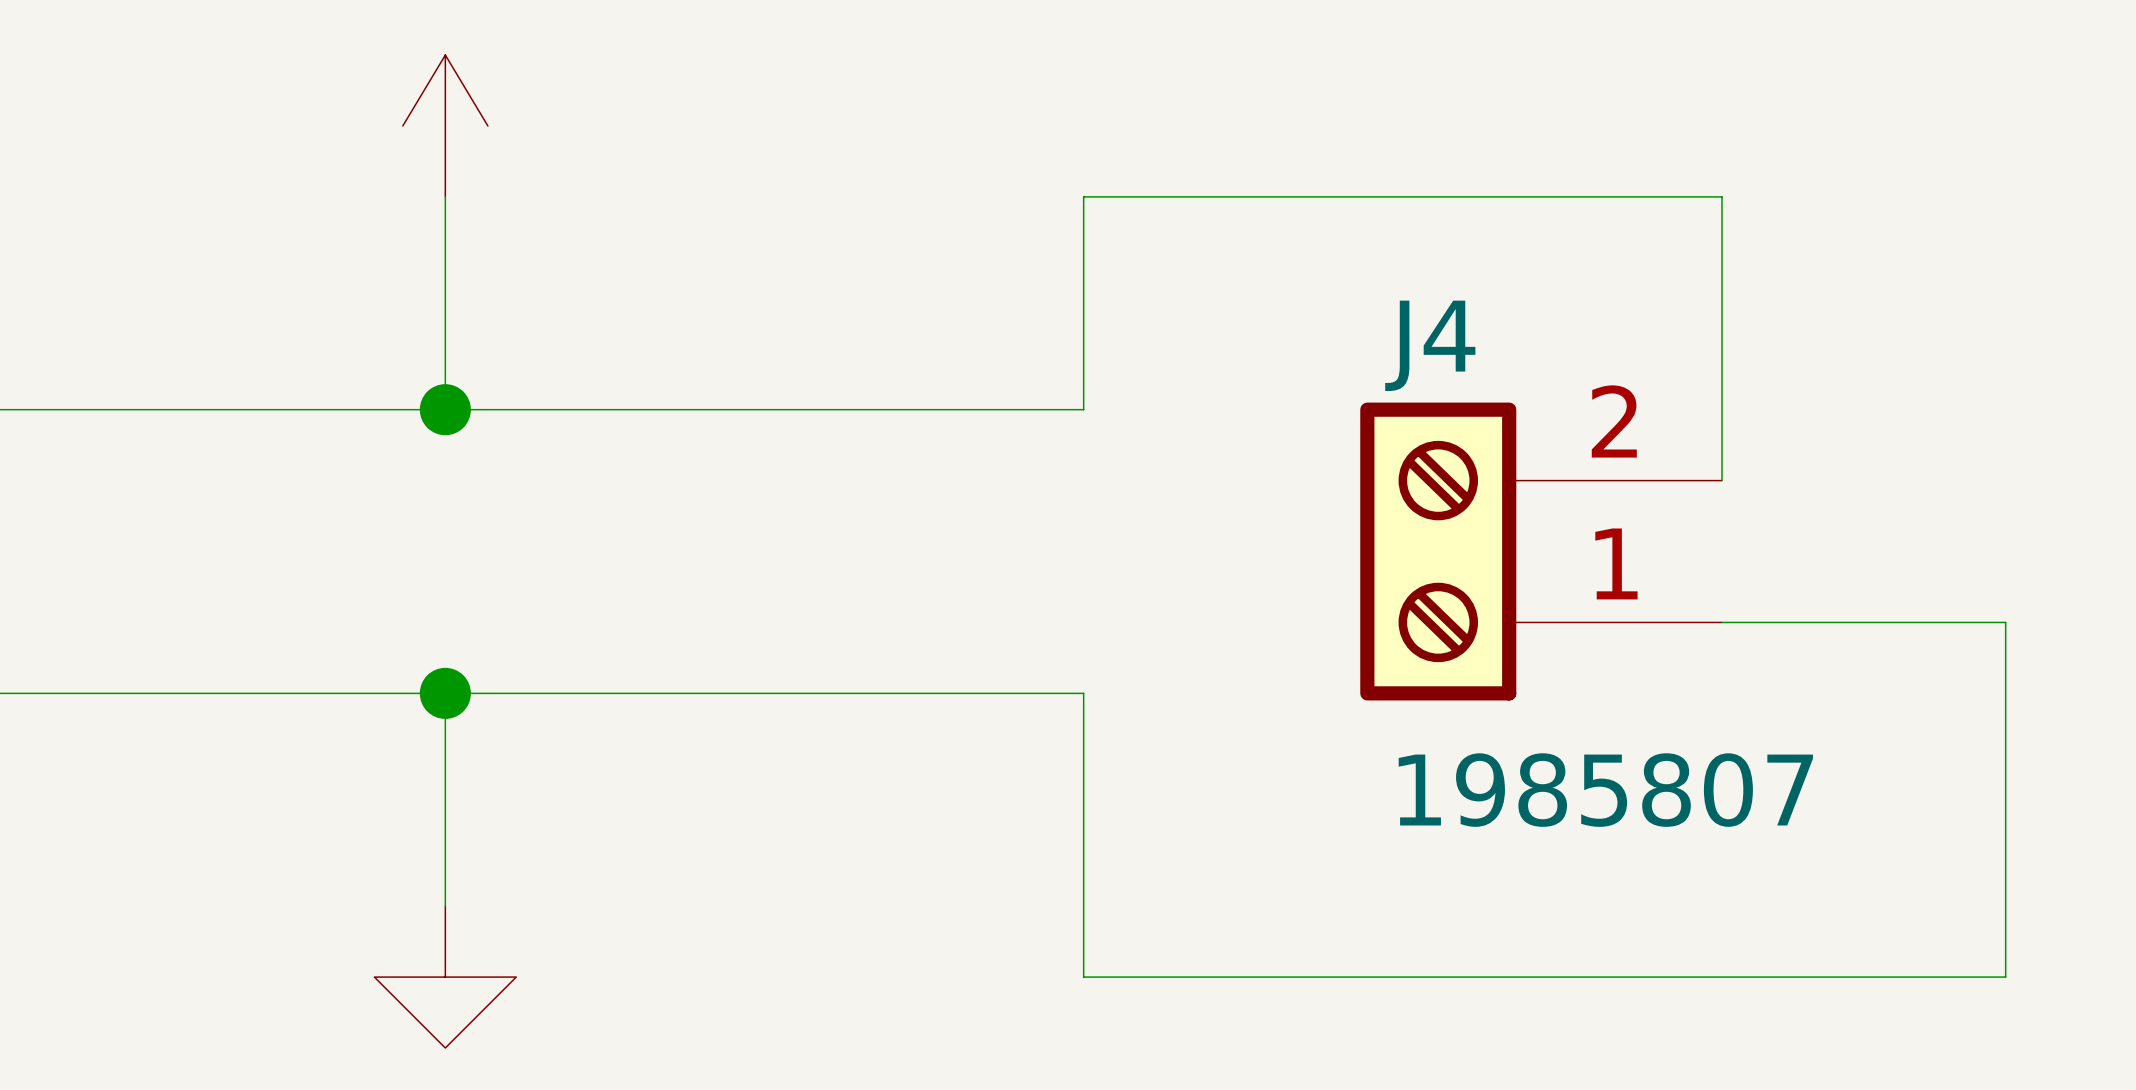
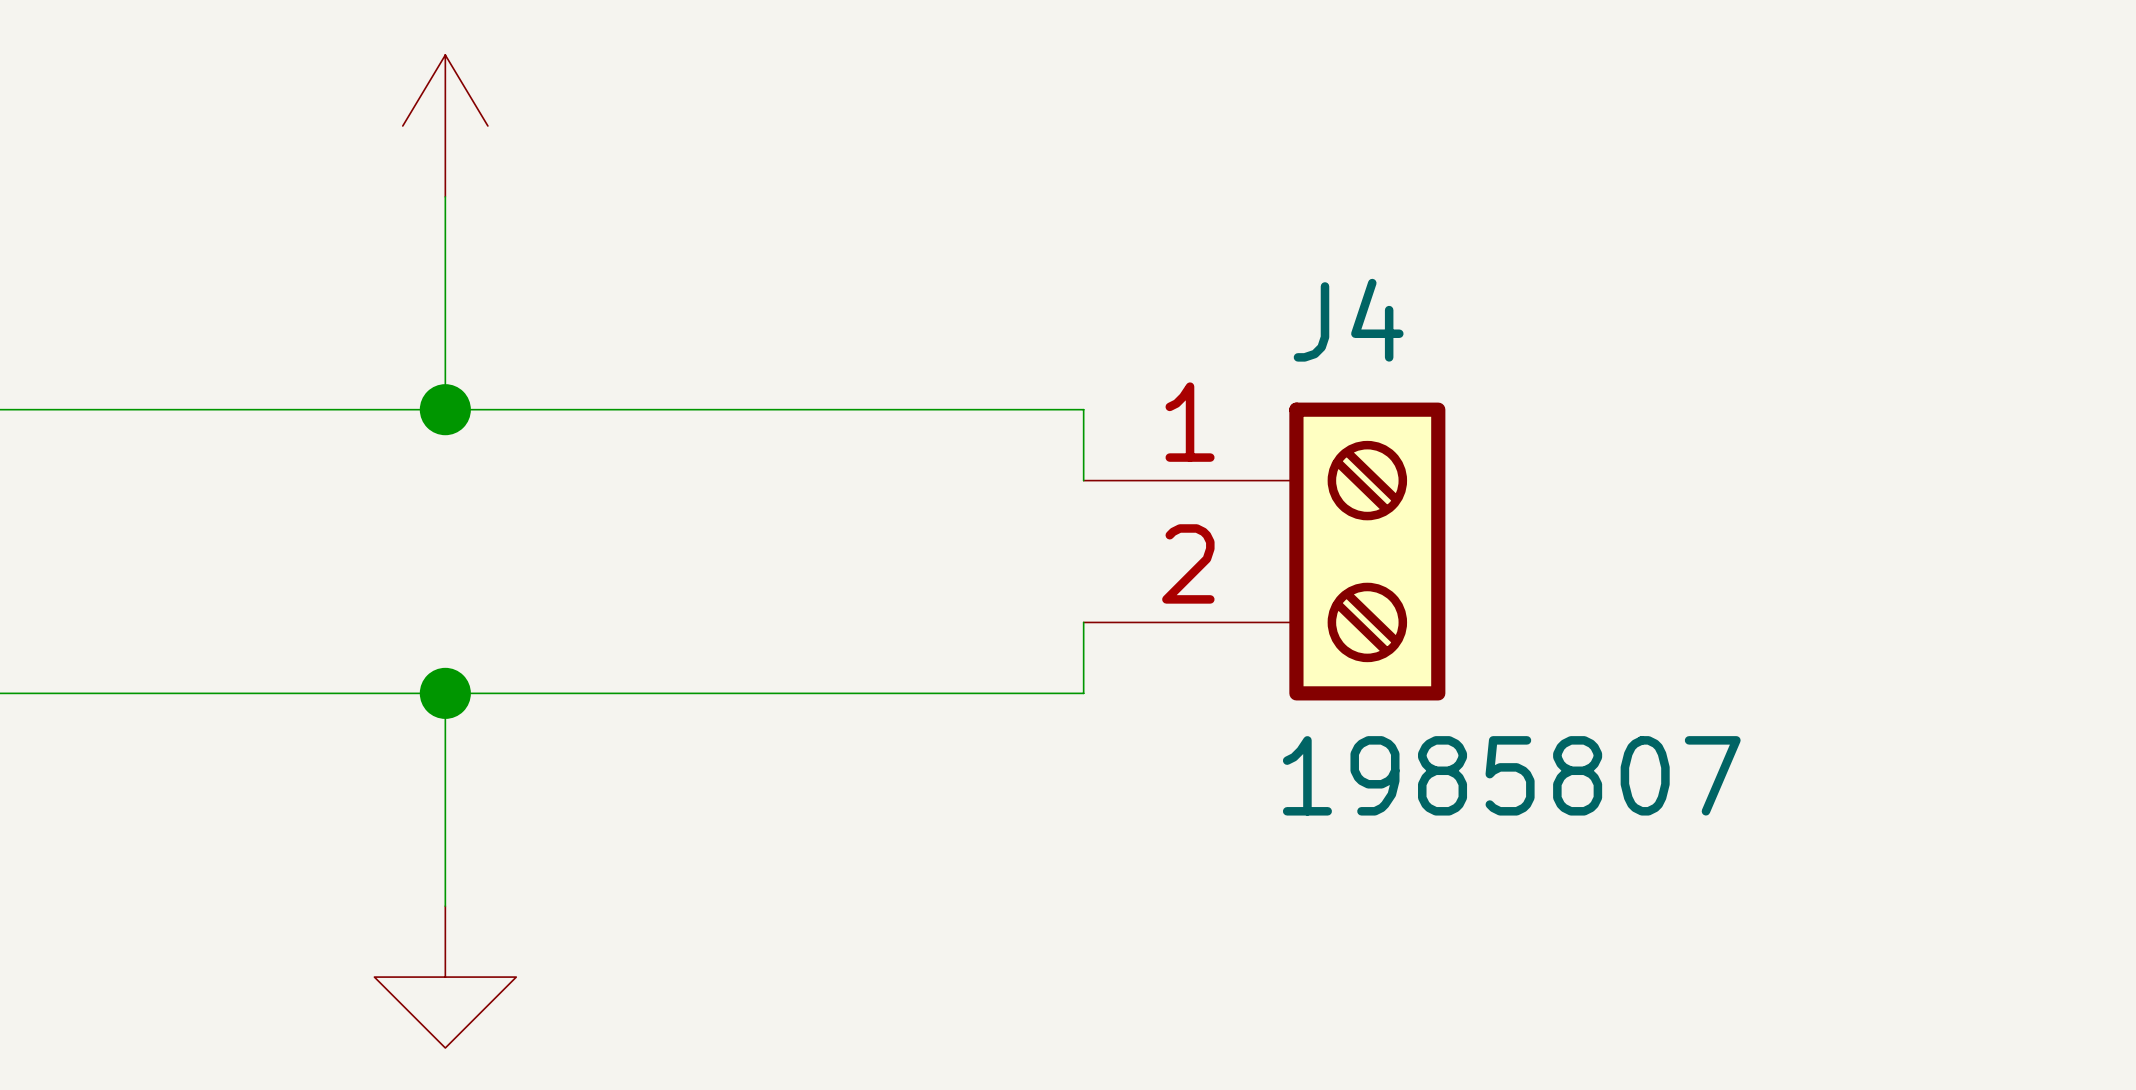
J4 name position: J4 (1430, 345) -> J4 (1348, 320)
wire: (1083, 409) (1083, 196) (1721, 196) (1721, 480) -> (1083, 409) (1083, 480)
J4 rotation: 0° (1438, 551) -> 180° (1367, 551)
J4 position: (1541, 551) -> (1264, 551)
wire: (1721, 622) (2005, 622) (2005, 977) (1083, 977) (1083, 693) -> (1083, 622) (1083, 693)
J4 value position: 1985807 (1605, 790) -> 1985807 (1511, 775)

